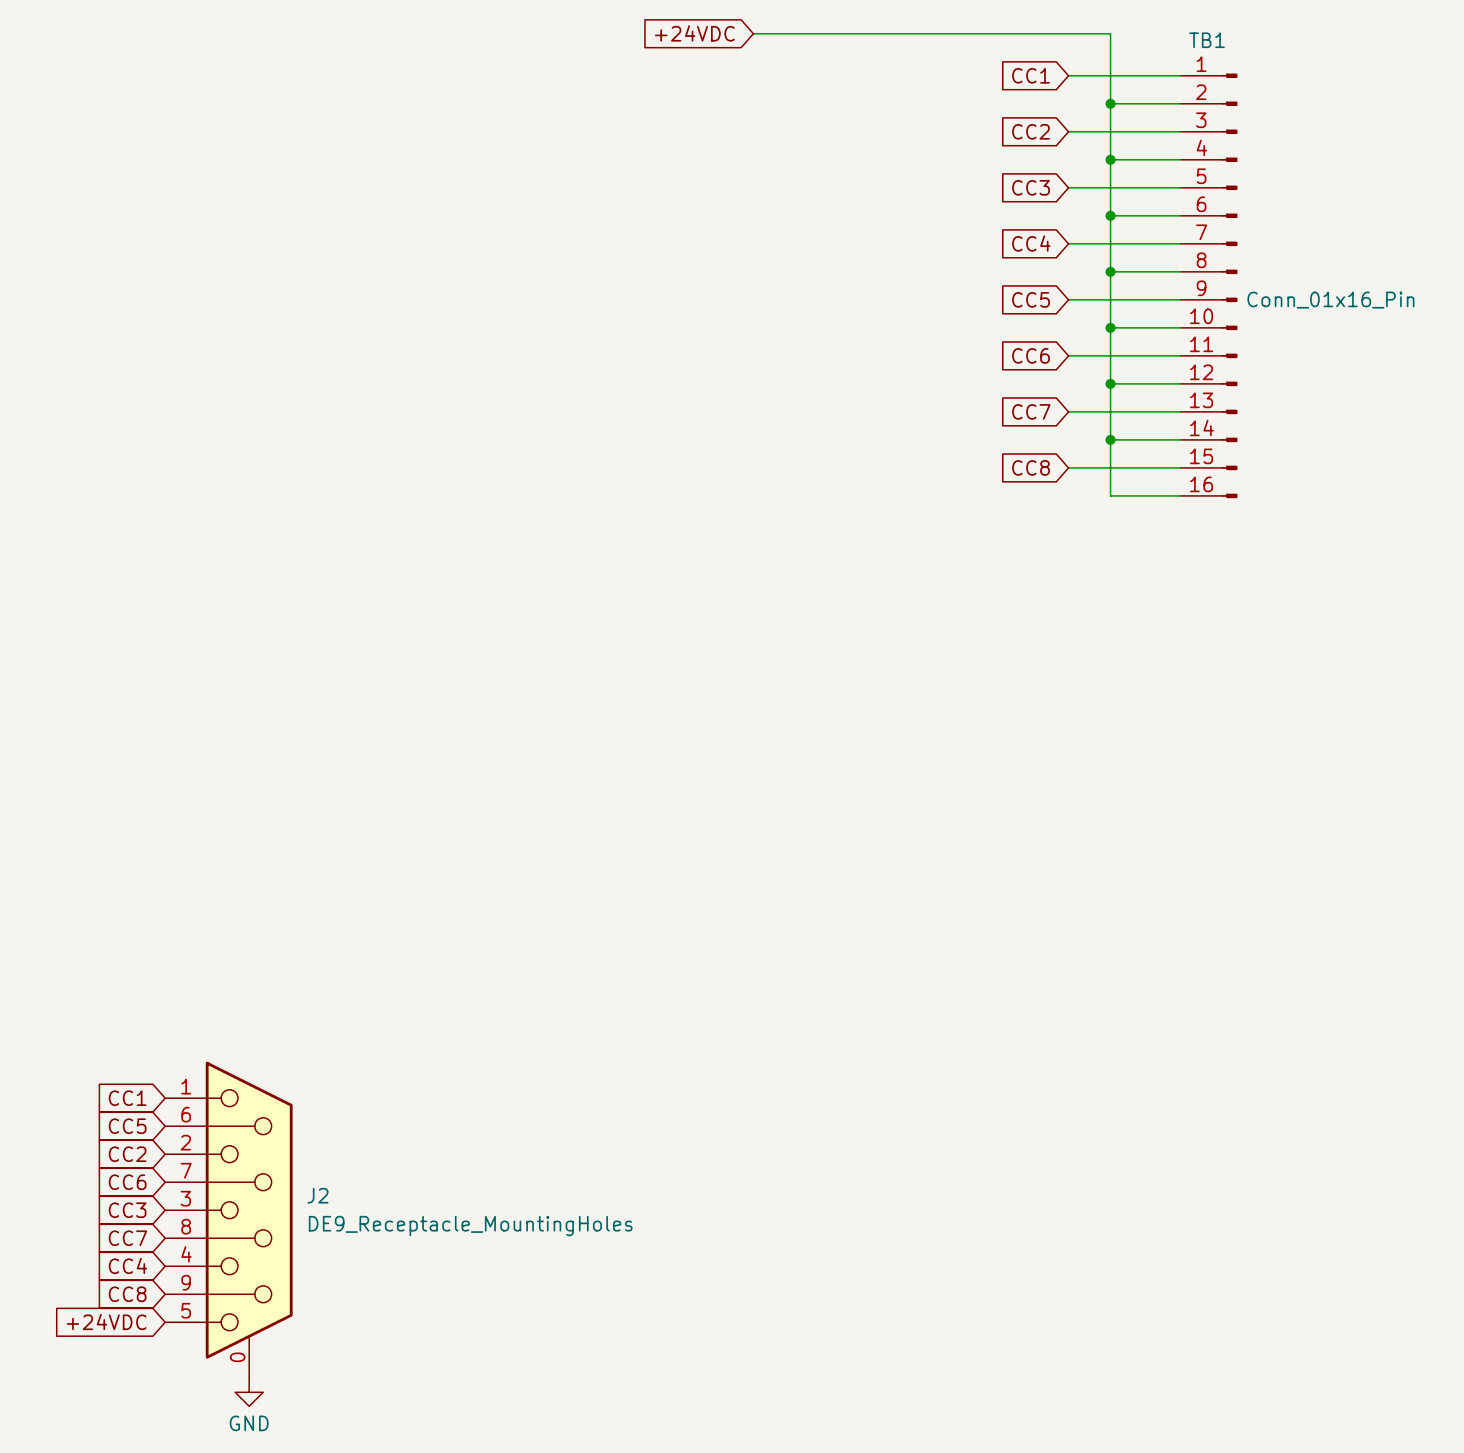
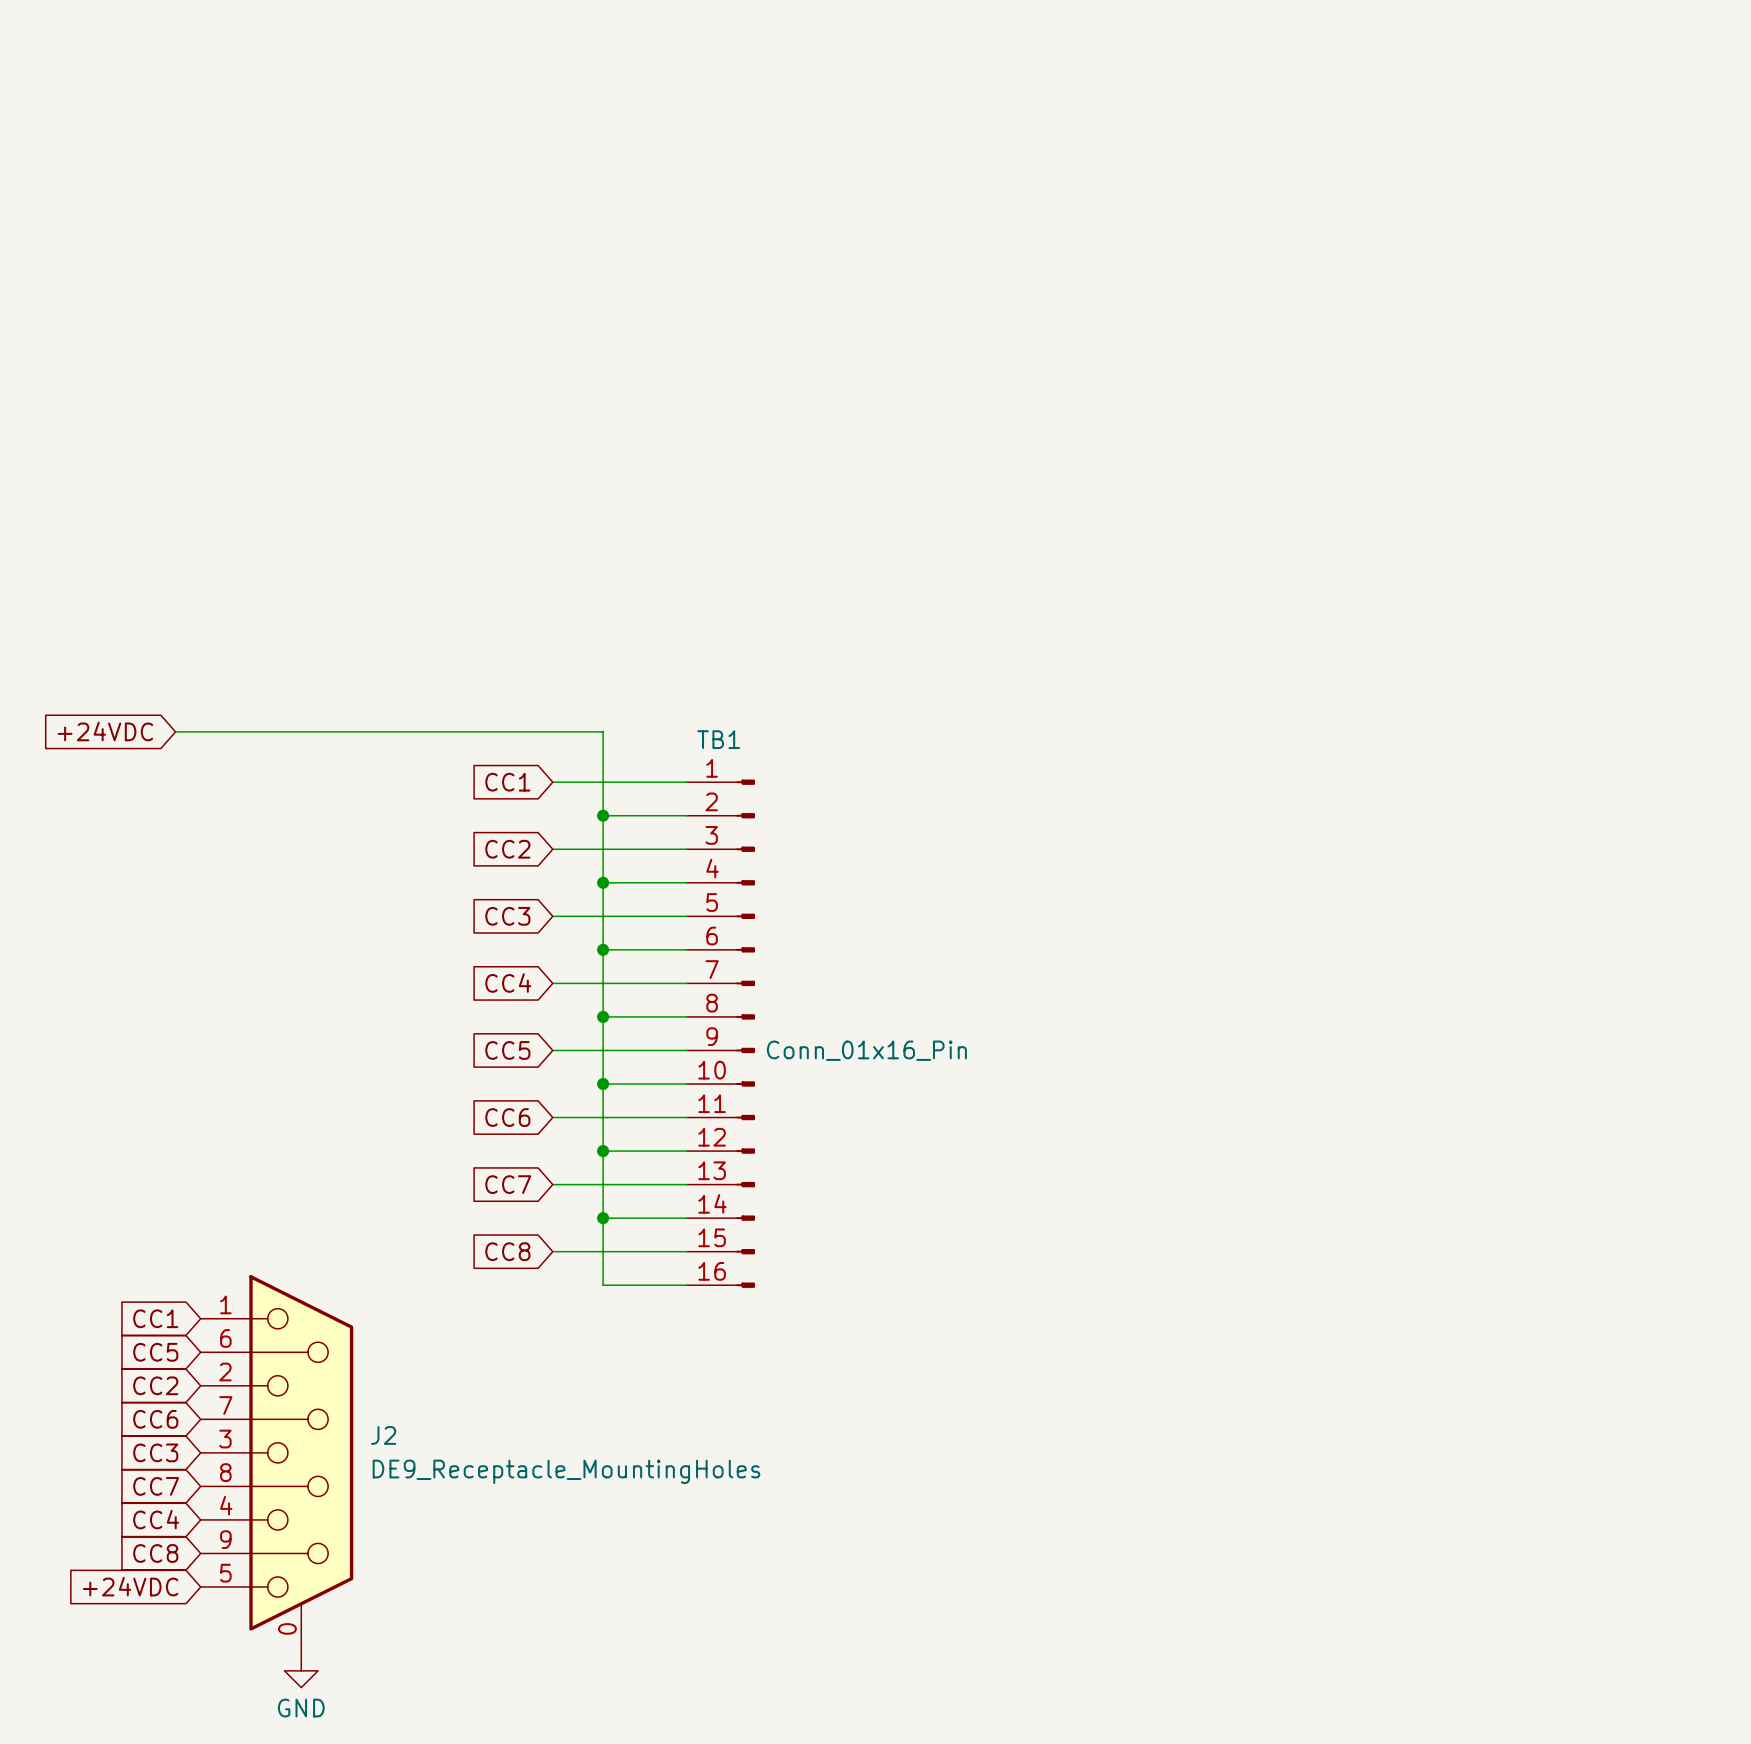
global label: +24VDC (694, 33) -> none
wire: (753, 33) (1110, 33) (1110, 495) (1180, 495) -> none
global label: CC1 (1031, 75) -> none
wire: (1068, 75) (1180, 75) -> none
wire: (1110, 103) (1180, 103) -> none
junction: (1110, 103) -> none
global label: CC2 (1031, 131) -> none
wire: (1068, 131) (1180, 131) -> none
wire: (1110, 159) (1180, 159) -> none
junction: (1110, 159) -> none
global label: CC3 (1031, 187) -> none
wire: (1068, 187) (1180, 187) -> none
wire: (1110, 215) (1180, 215) -> none
junction: (1110, 215) -> none
global label: CC4 (1031, 243) -> none
wire: (1068, 243) (1180, 243) -> none
wire: (1110, 271) (1180, 271) -> none
junction: (1110, 271) -> none
TB1 position: (1209, 285) -> (720, 1033)
global label: CC5 (1031, 299) -> none
wire: (1068, 299) (1180, 299) -> none
wire: (1110, 327) (1180, 327) -> none
junction: (1110, 327) -> none
global label: CC6 (1031, 355) -> none
wire: (1068, 355) (1180, 355) -> none
wire: (1110, 383) (1180, 383) -> none
junction: (1110, 383) -> none
global label: CC7 (1031, 411) -> none
wire: (1068, 411) (1180, 411) -> none
wire: (1110, 439) (1180, 439) -> none
junction: (1110, 439) -> none
global label: CC8 (1031, 467) -> none
wire: (1068, 467) (1180, 467) -> none
global label: none -> +24VDC (105, 731)
wire: none -> (175, 731) (603, 731) (603, 1285) (686, 1285)
global label: none -> CC1 (507, 782)
wire: none -> (552, 782) (686, 782)
wire: none -> (603, 815) (686, 815)
junction: none -> (603, 815)
global label: none -> CC2 (507, 849)
wire: none -> (552, 849) (686, 849)
wire: none -> (603, 882) (686, 882)
junction: none -> (603, 882)
global label: none -> CC3 (507, 916)
wire: none -> (552, 916) (686, 916)
wire: none -> (603, 949) (686, 949)
junction: none -> (603, 949)
global label: none -> CC4 (508, 983)
wire: none -> (552, 983) (686, 983)
wire: none -> (603, 1016) (686, 1016)
junction: none -> (603, 1016)
global label: none -> CC5 (507, 1050)
wire: none -> (552, 1050) (686, 1050)
wire: none -> (603, 1084) (686, 1084)
junction: none -> (603, 1084)
global label: none -> CC6 (507, 1117)
wire: none -> (552, 1117) (686, 1117)
wire: none -> (603, 1151) (686, 1151)
junction: none -> (603, 1151)
global label: none -> CC7 (508, 1184)
wire: none -> (552, 1184) (686, 1184)
wire: none -> (603, 1218) (686, 1218)
junction: none -> (603, 1218)
global label: none -> CC8 (507, 1251)
wire: none -> (552, 1251) (686, 1251)

